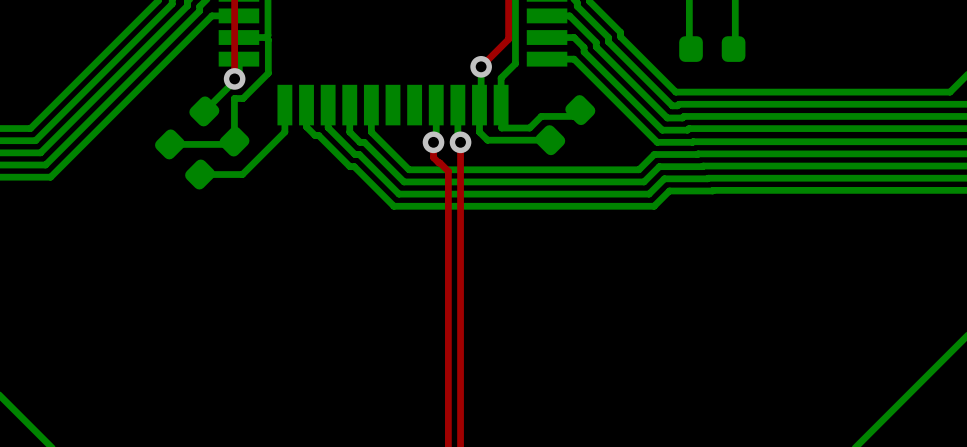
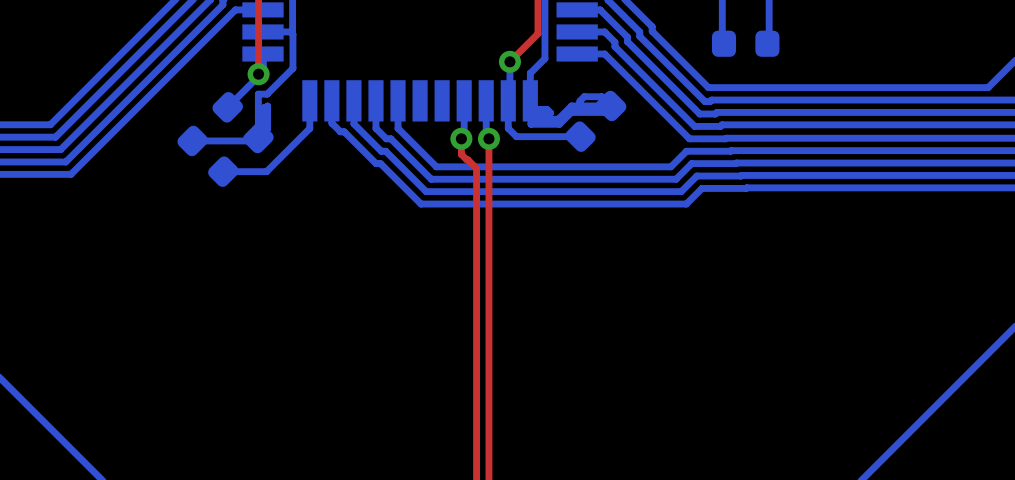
bottom track: none -> (580, 105) (579, 101) (584, 96) (601, 96) (611, 105) (571, 105) (558, 119) (538, 119) (538, 109) (547, 109) (550, 112) (543, 112)
bottom track: none -> (262, 122) (262, 109) (267, 106) (267, 128) (258, 138)

